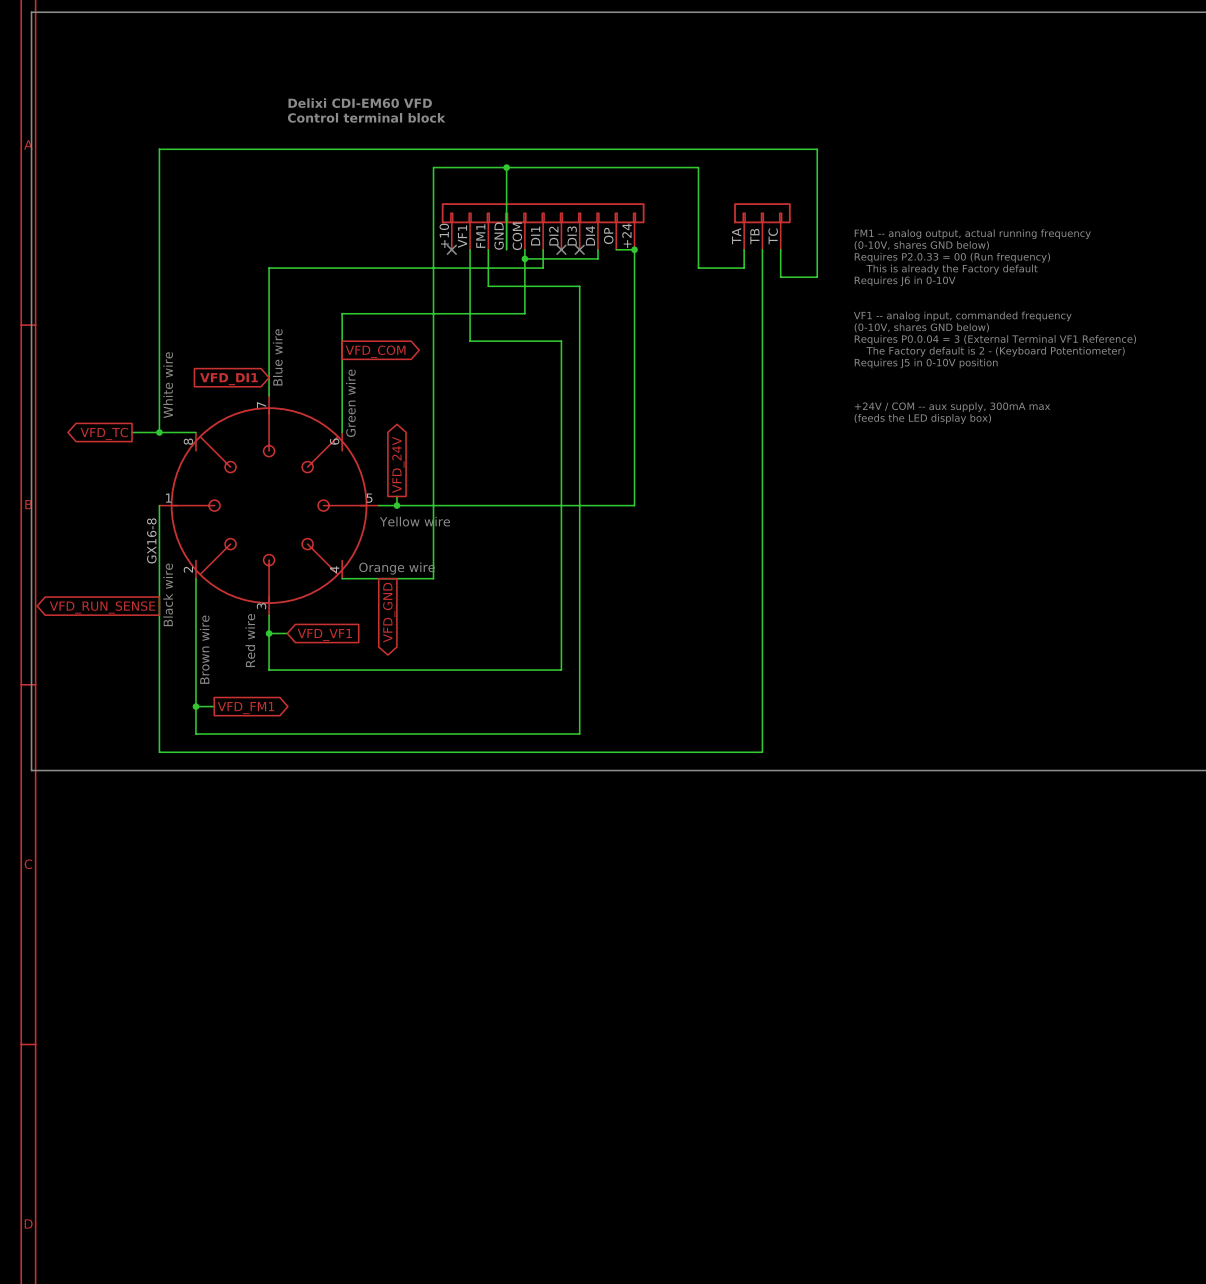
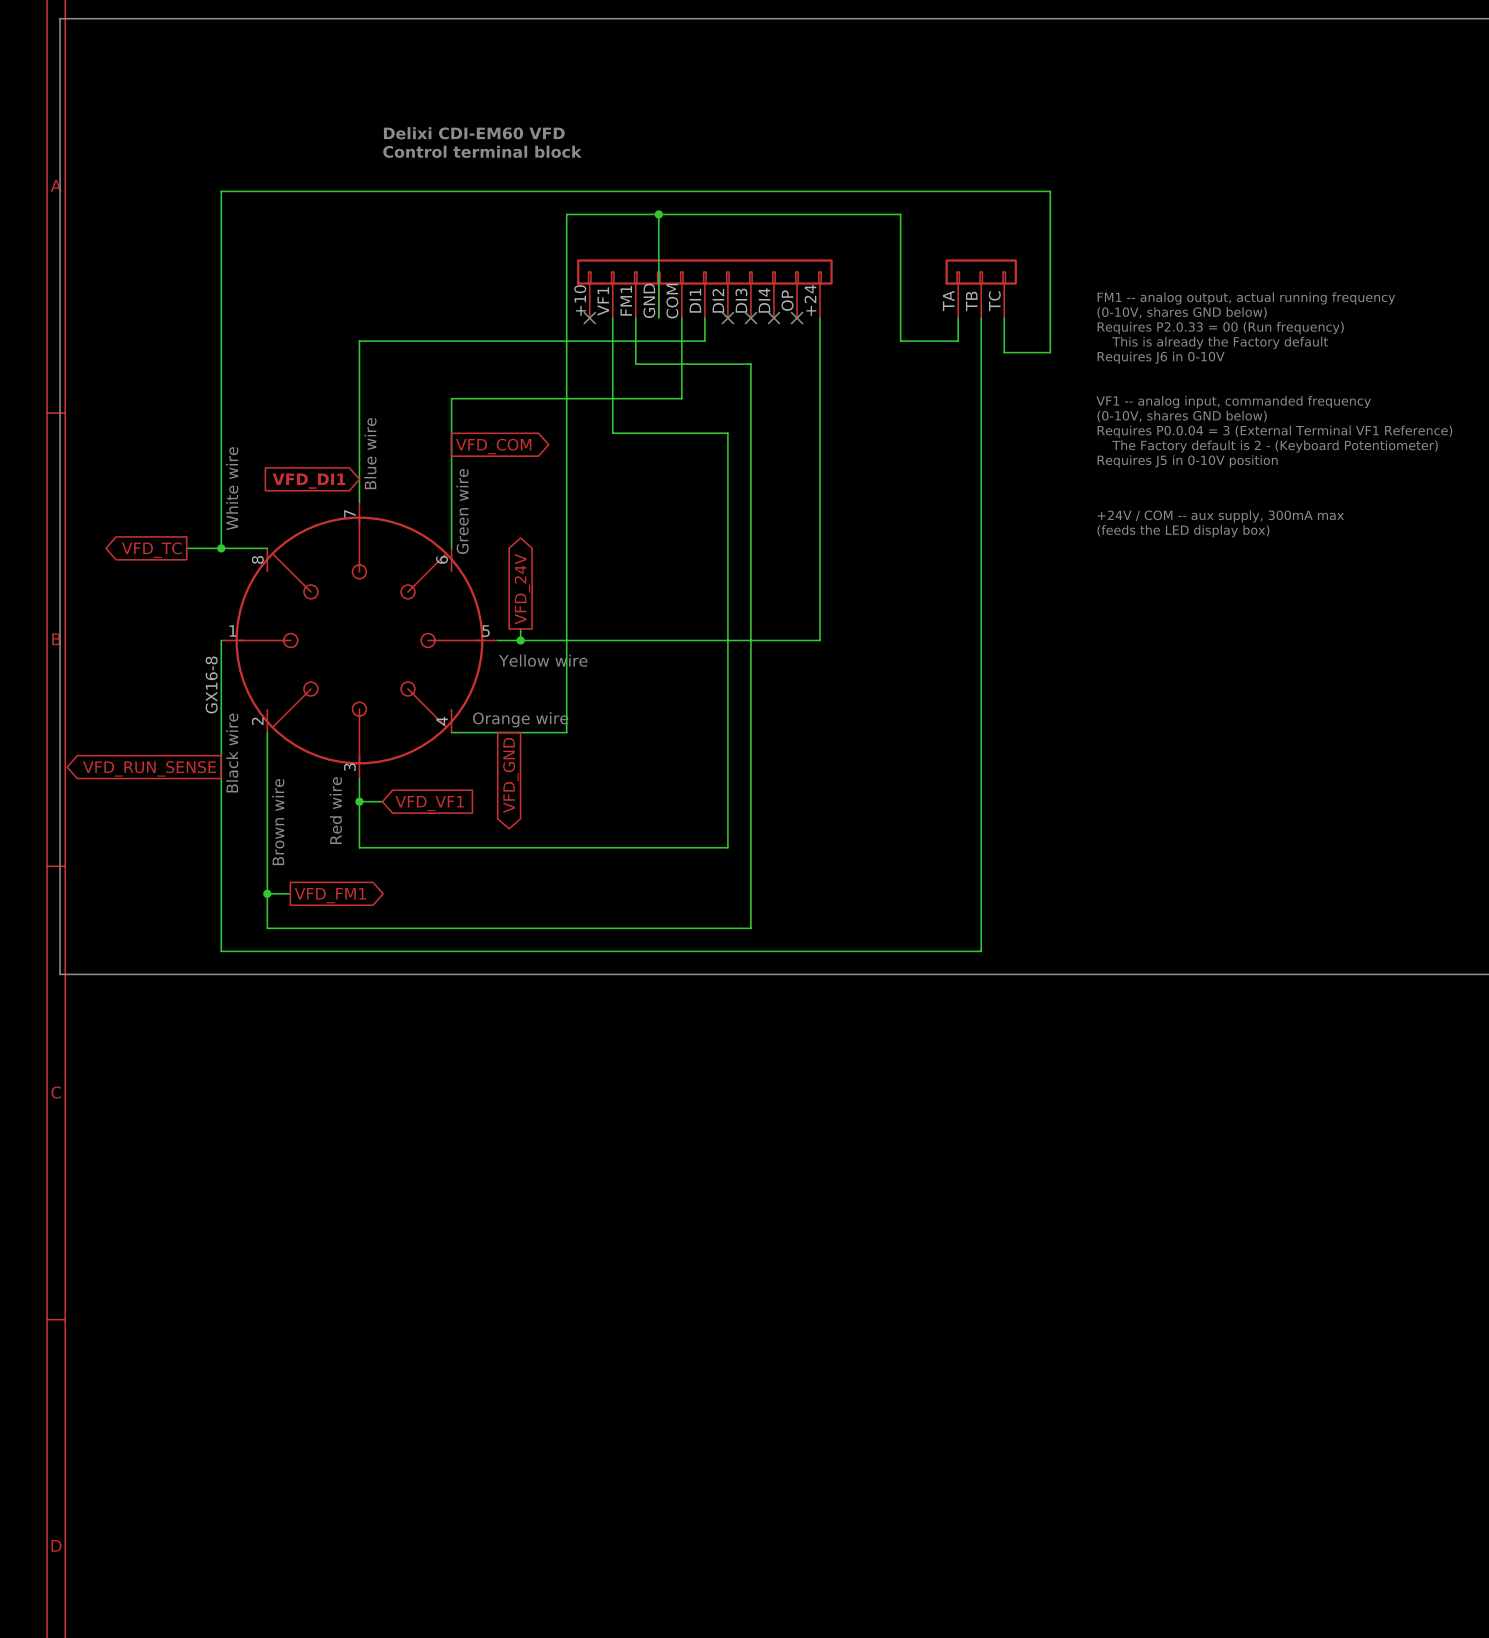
wire: (597, 249) (597, 258) (524, 258) -> none
no-connect mark: none -> (773, 318)
wire: (616, 249) (634, 249) -> none
no-connect mark: none -> (797, 318)
junction: (634, 249) -> none
junction: (524, 258) -> none

